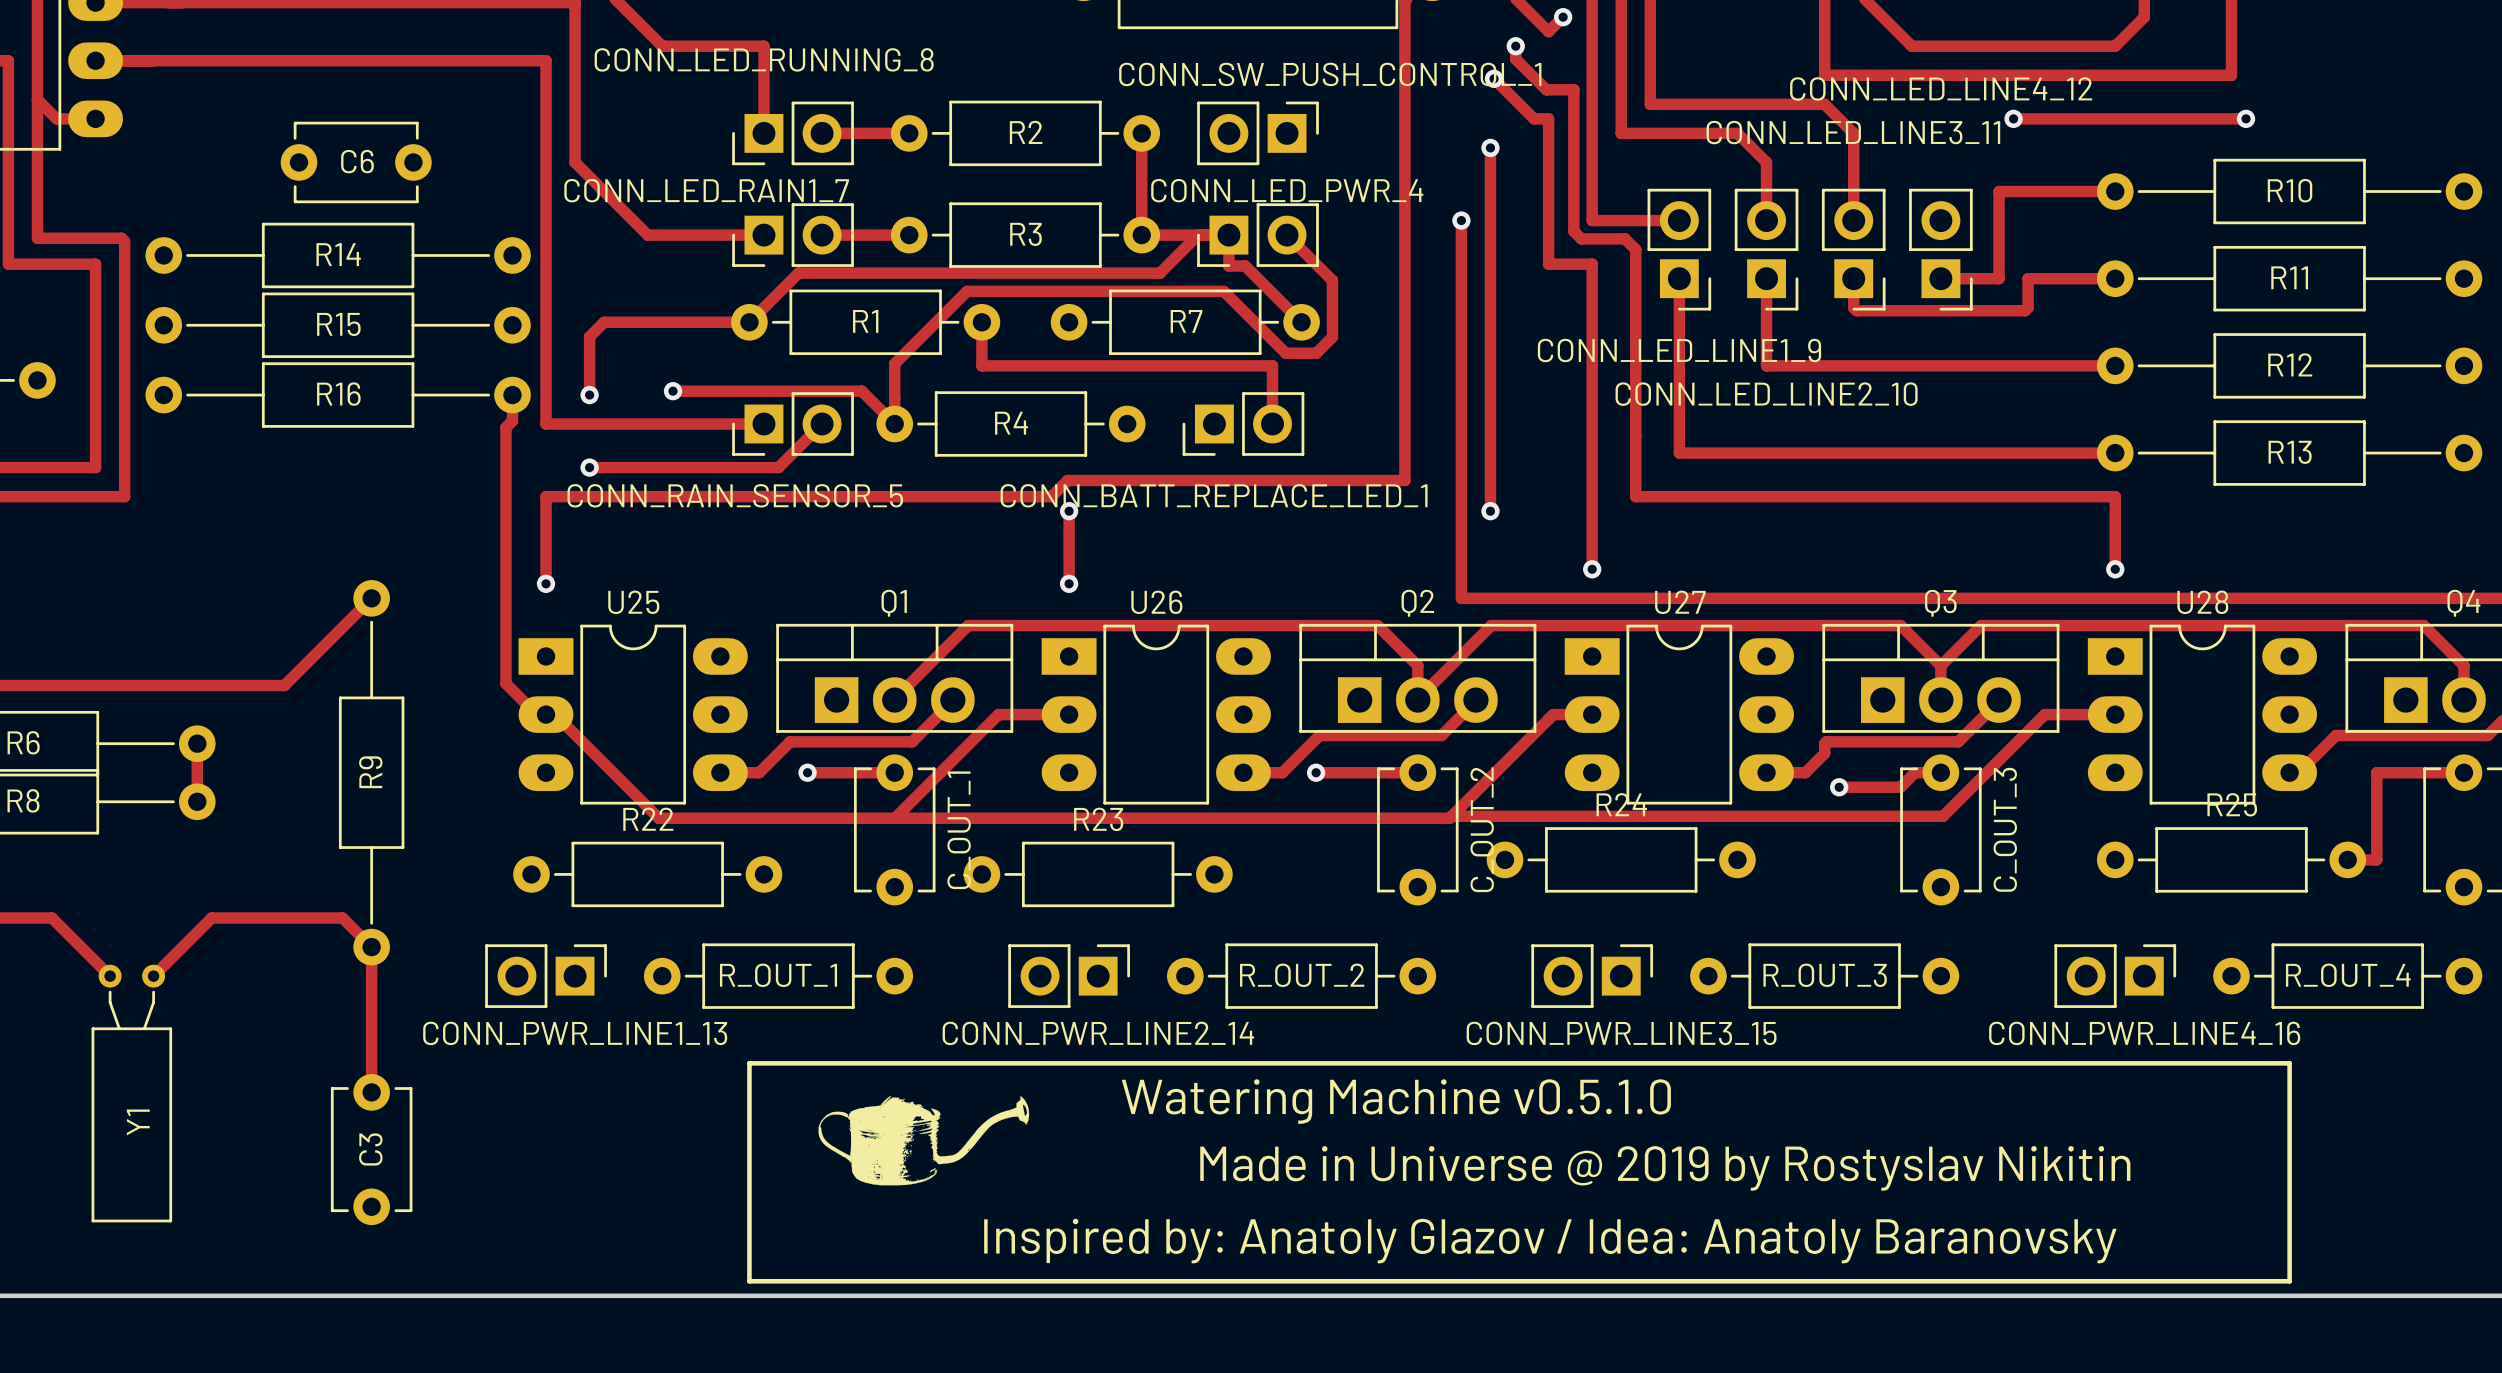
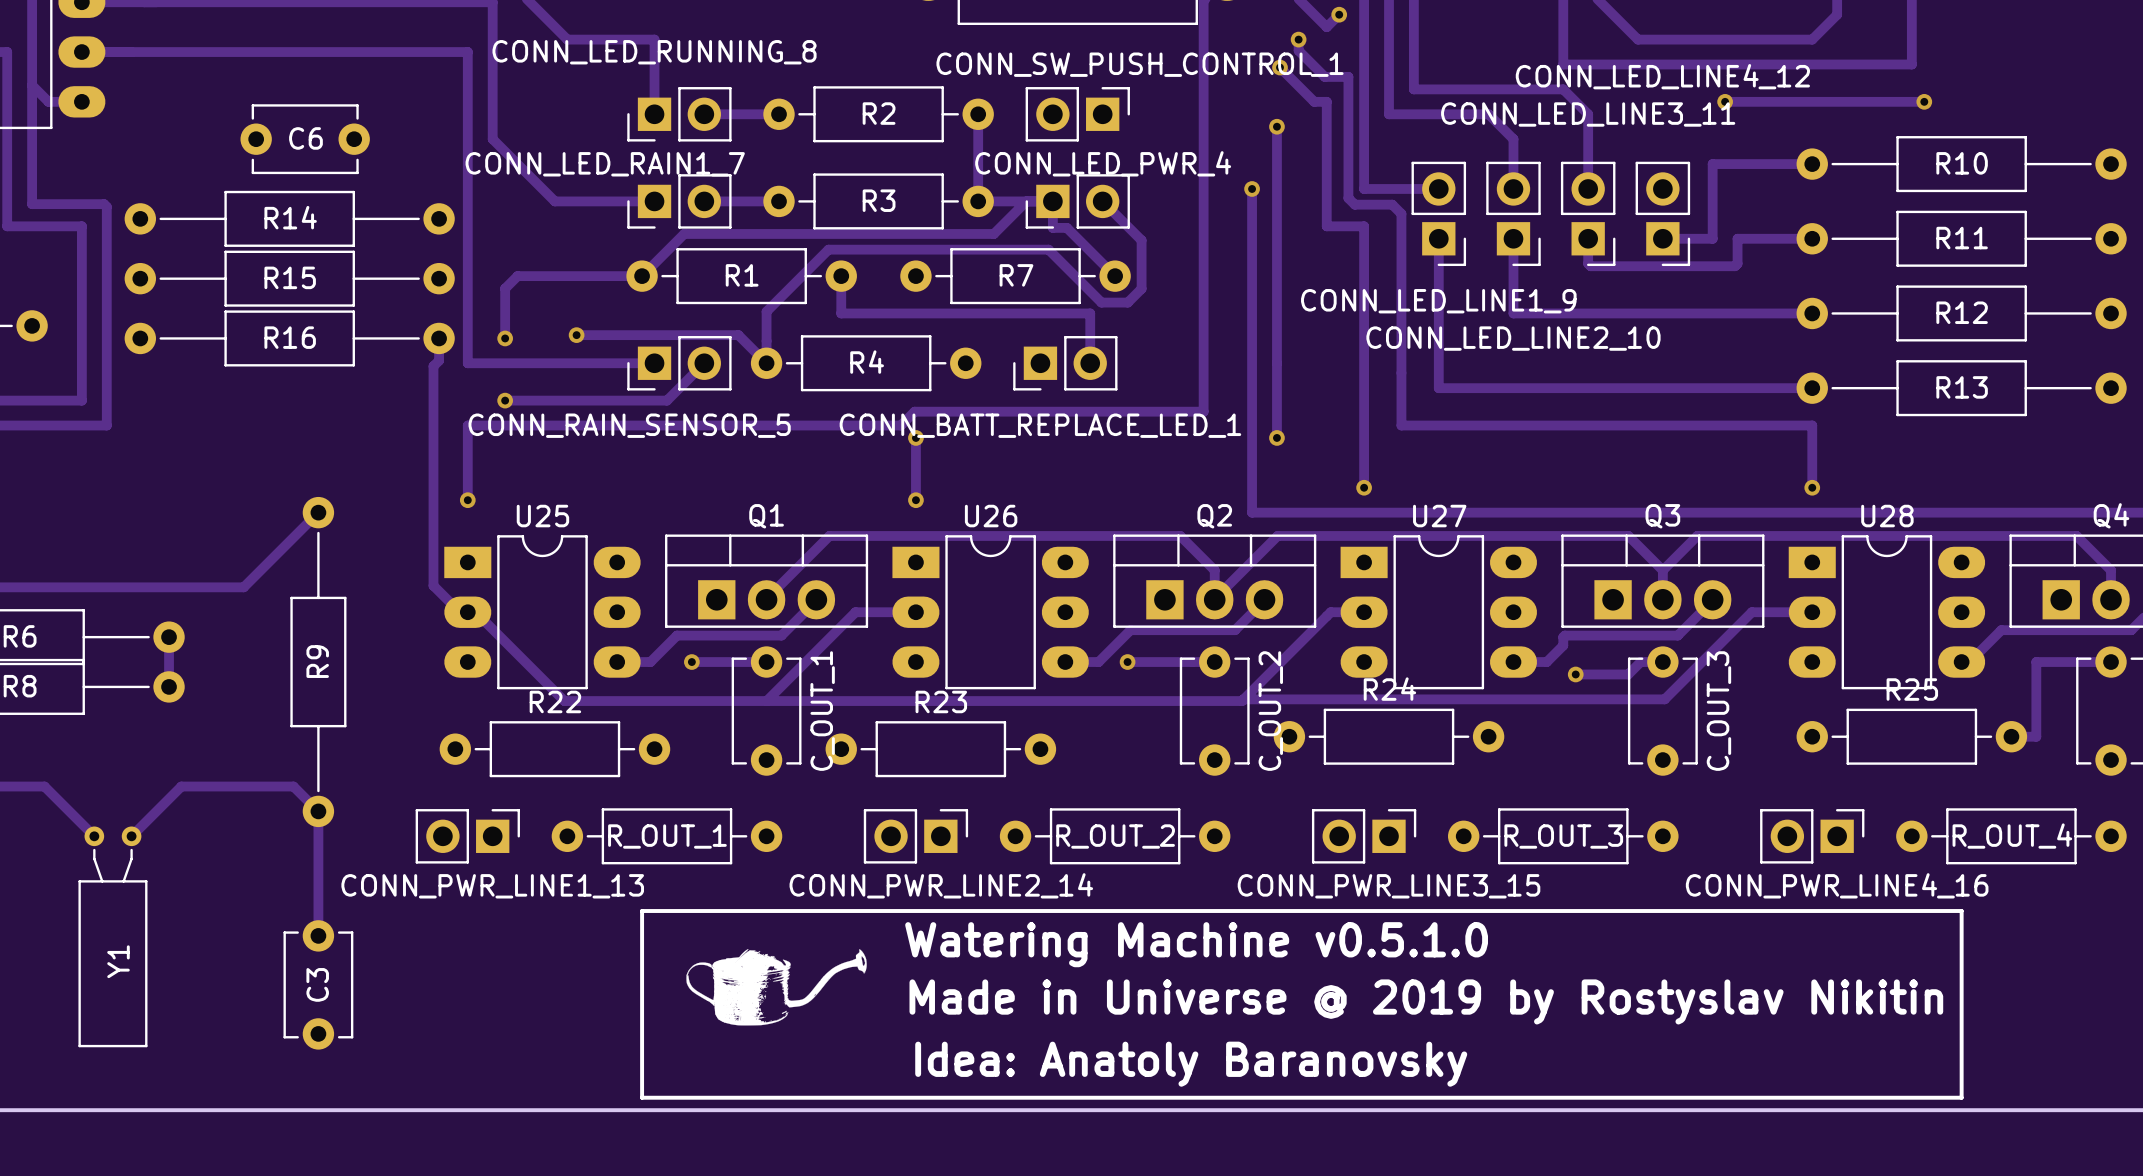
drawing position: (923, 1140) -> (776, 987)
text: Inspired by: Anatoly Glazov / Idea: Anatoly Baranovsky (1550, 1241) -> Idea: Anatoly Baranovsky (1191, 1064)

